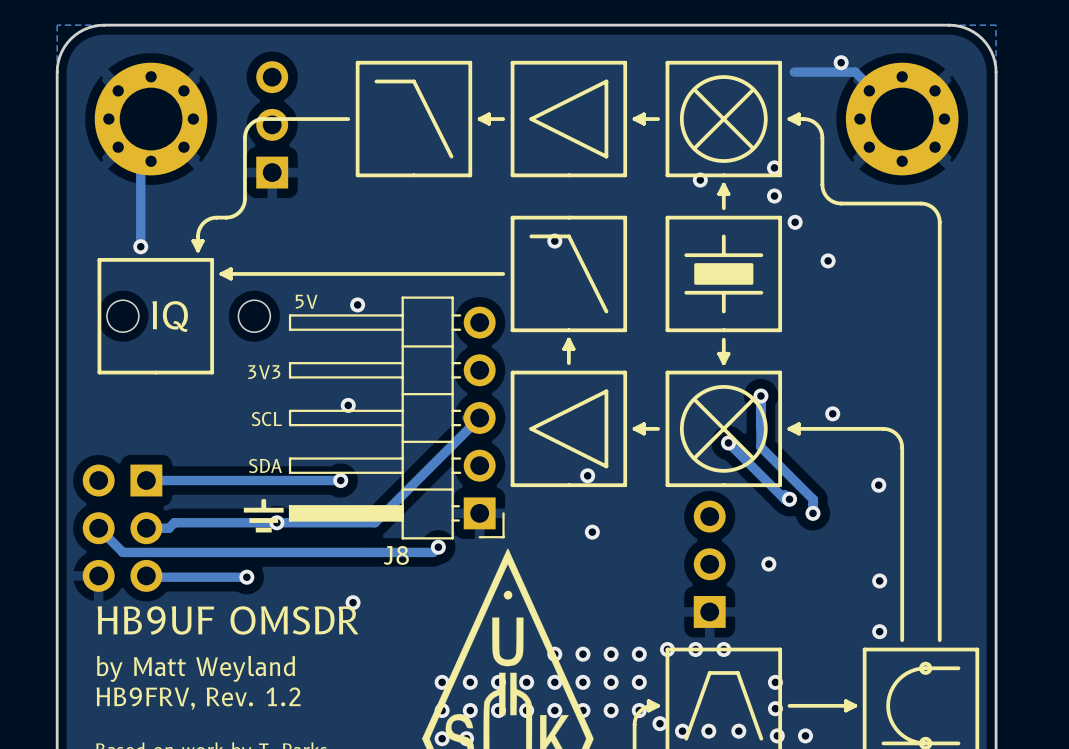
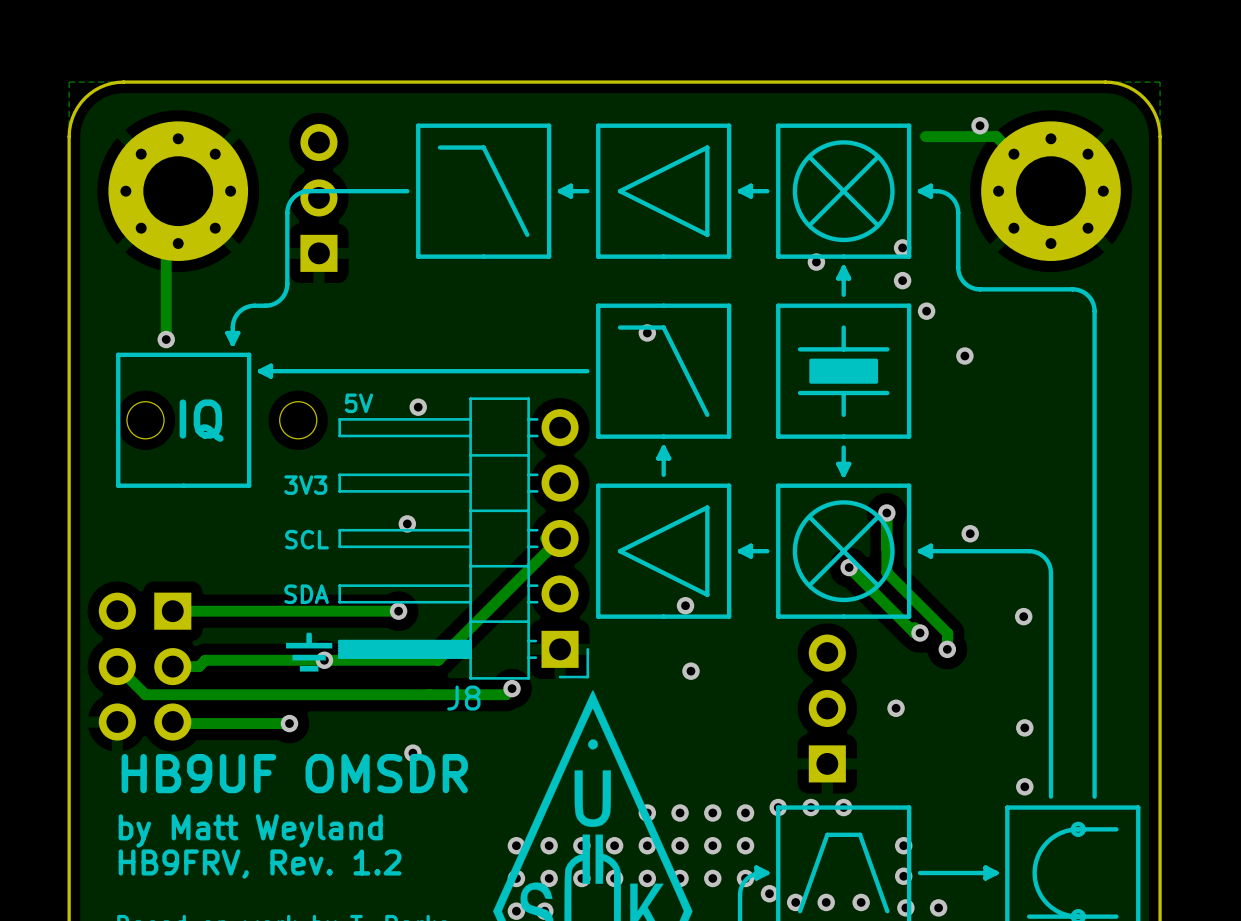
part footprint: [94, 62, 208, 176] -> [108, 121, 249, 261]
part footprint: [845, 62, 959, 176] -> [981, 121, 1121, 261]

